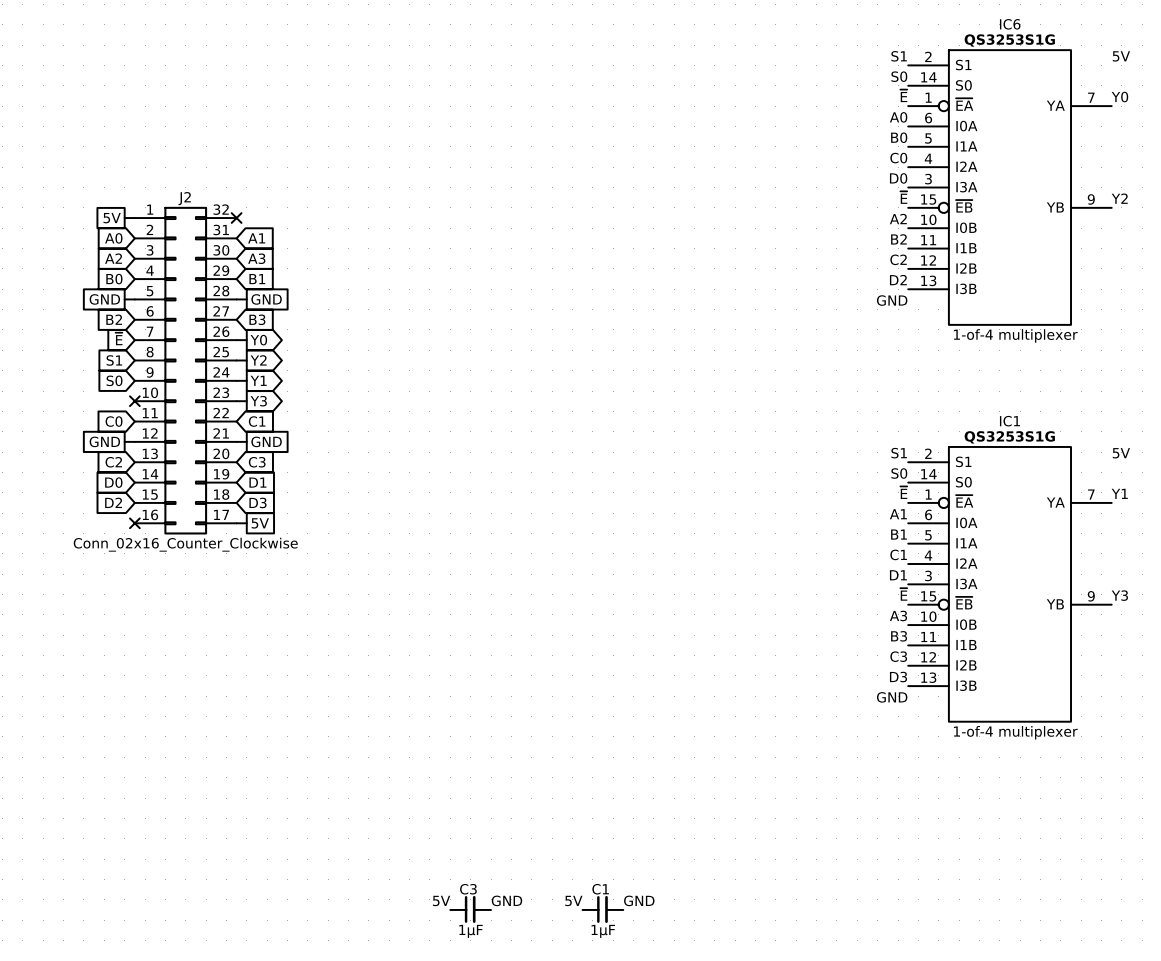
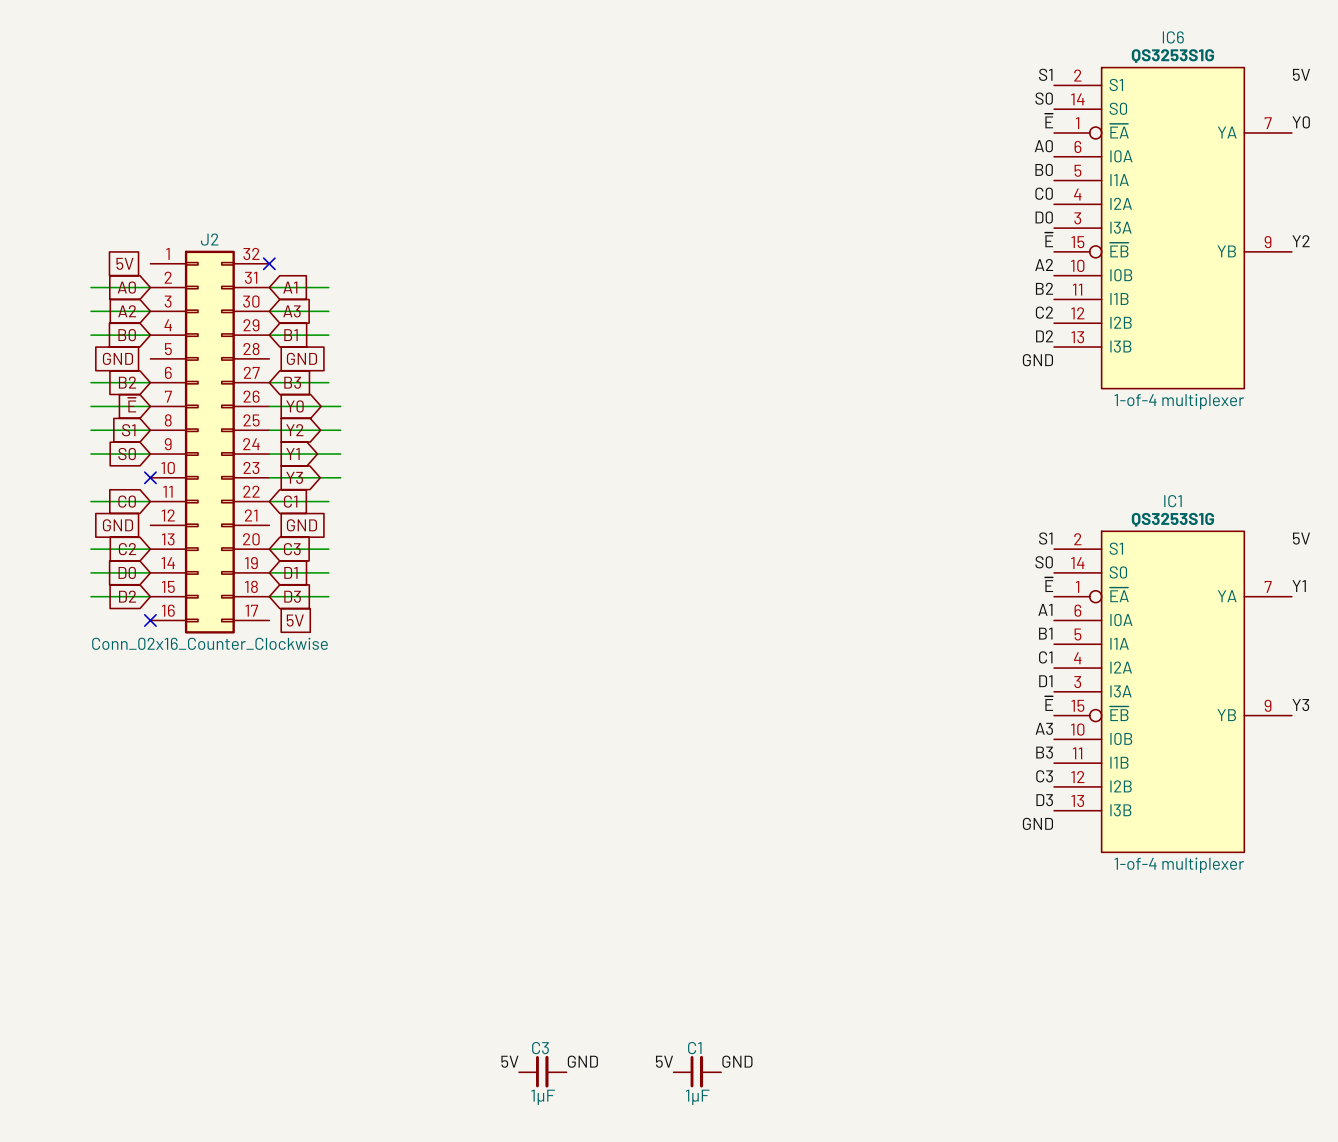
wire: (124, 218) (134, 218) -> none
wire: none -> (90, 287) (150, 287)
wire: none -> (269, 287) (328, 287)
wire: none -> (90, 311) (150, 311)
wire: none -> (269, 311) (328, 311)
wire: none -> (90, 335) (150, 335)
wire: none -> (269, 335) (328, 335)
wire: (124, 299) (134, 299) -> none
wire: (236, 299) (246, 299) -> none
wire: none -> (90, 382) (150, 382)
wire: none -> (269, 382) (328, 382)
wire: none -> (90, 406) (150, 406)
wire: none -> (281, 406) (340, 406)
wire: none -> (90, 430) (150, 430)
wire: none -> (281, 430) (340, 430)
wire: none -> (90, 454) (150, 454)
wire: none -> (281, 454) (340, 454)
wire: none -> (281, 477) (340, 477)
wire: none -> (90, 501) (150, 501)
wire: none -> (269, 501) (328, 501)
wire: (124, 441) (134, 441) -> none
wire: (236, 441) (246, 441) -> none
wire: none -> (90, 549) (150, 549)
wire: none -> (269, 549) (328, 549)
wire: none -> (90, 572) (150, 572)
wire: none -> (269, 572) (328, 572)
wire: none -> (90, 596) (150, 596)
wire: none -> (269, 596) (328, 596)
wire: (236, 523) (246, 523) -> none

